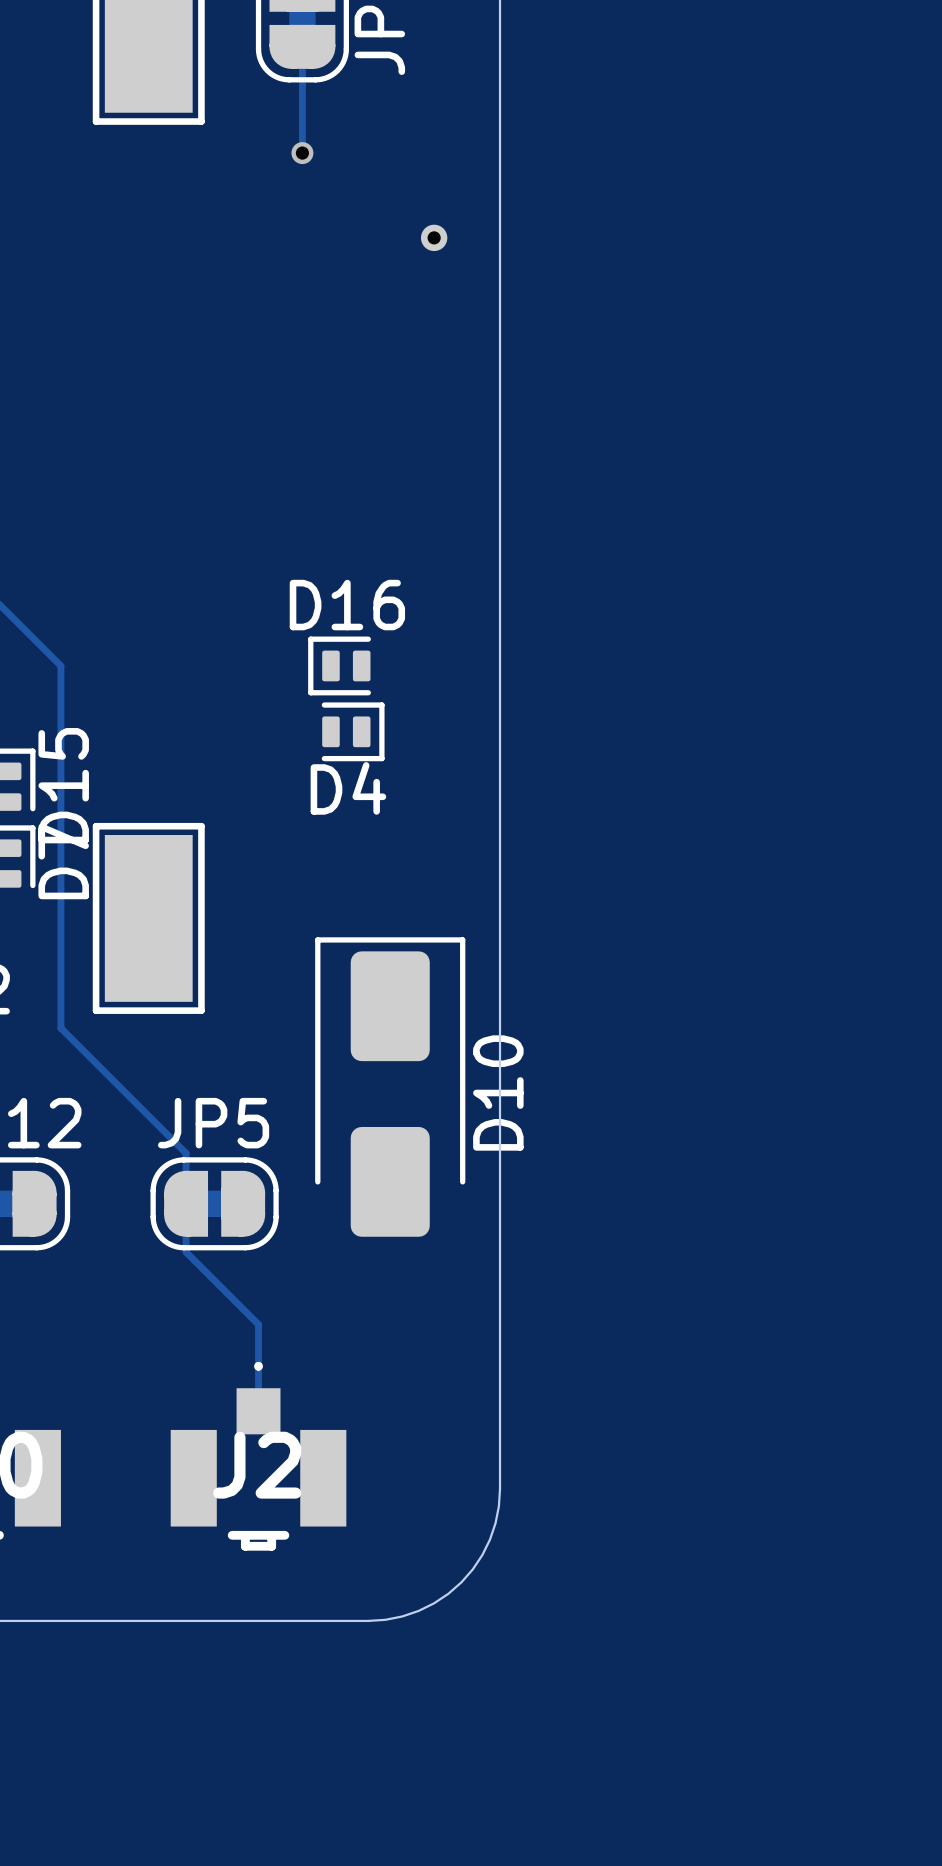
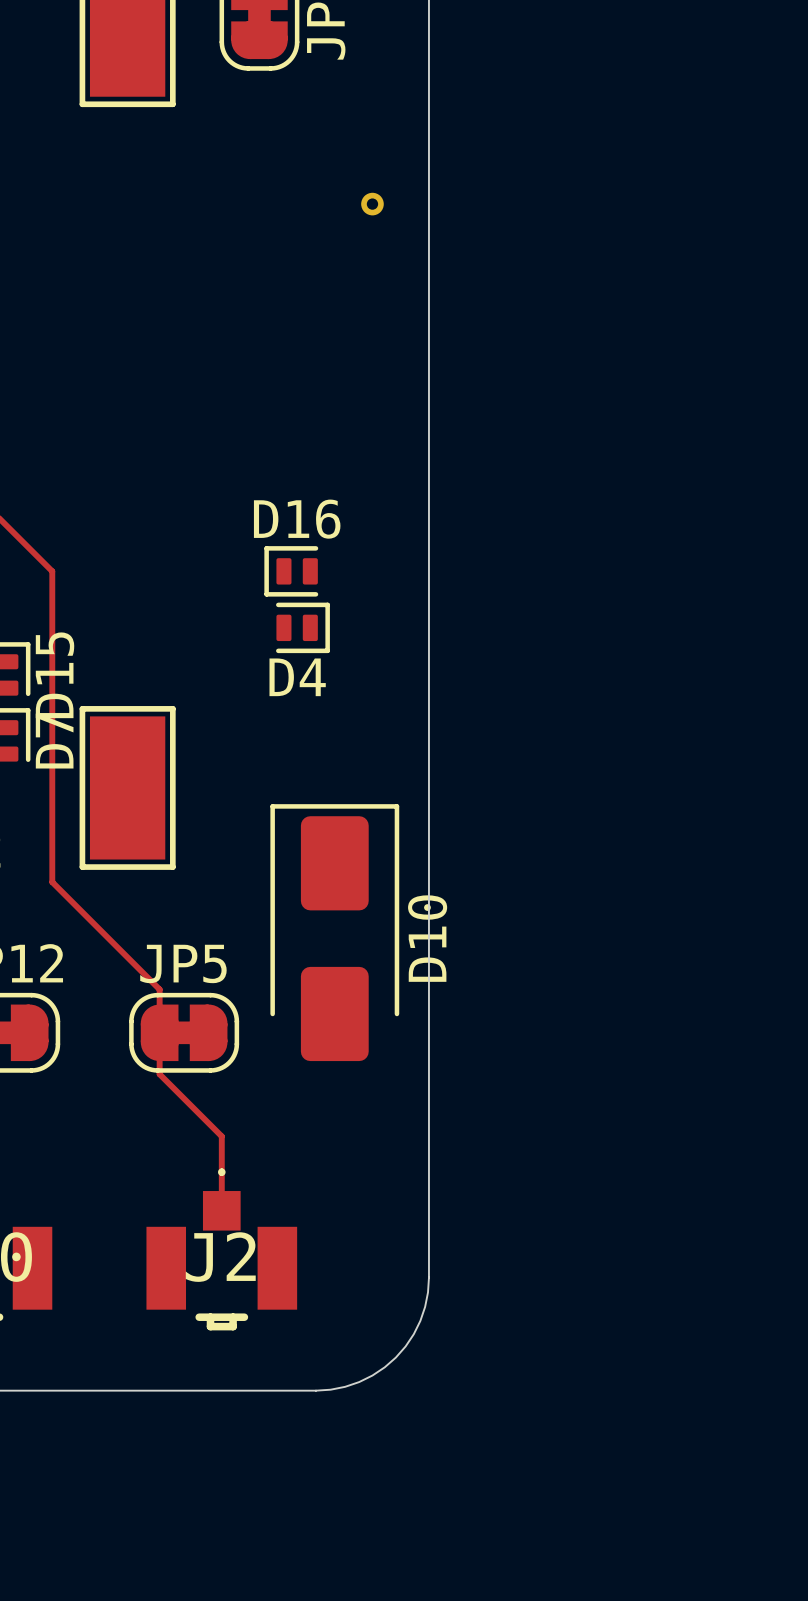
track: (302, 46) (302, 153) -> none
via: (302, 153) -> none

